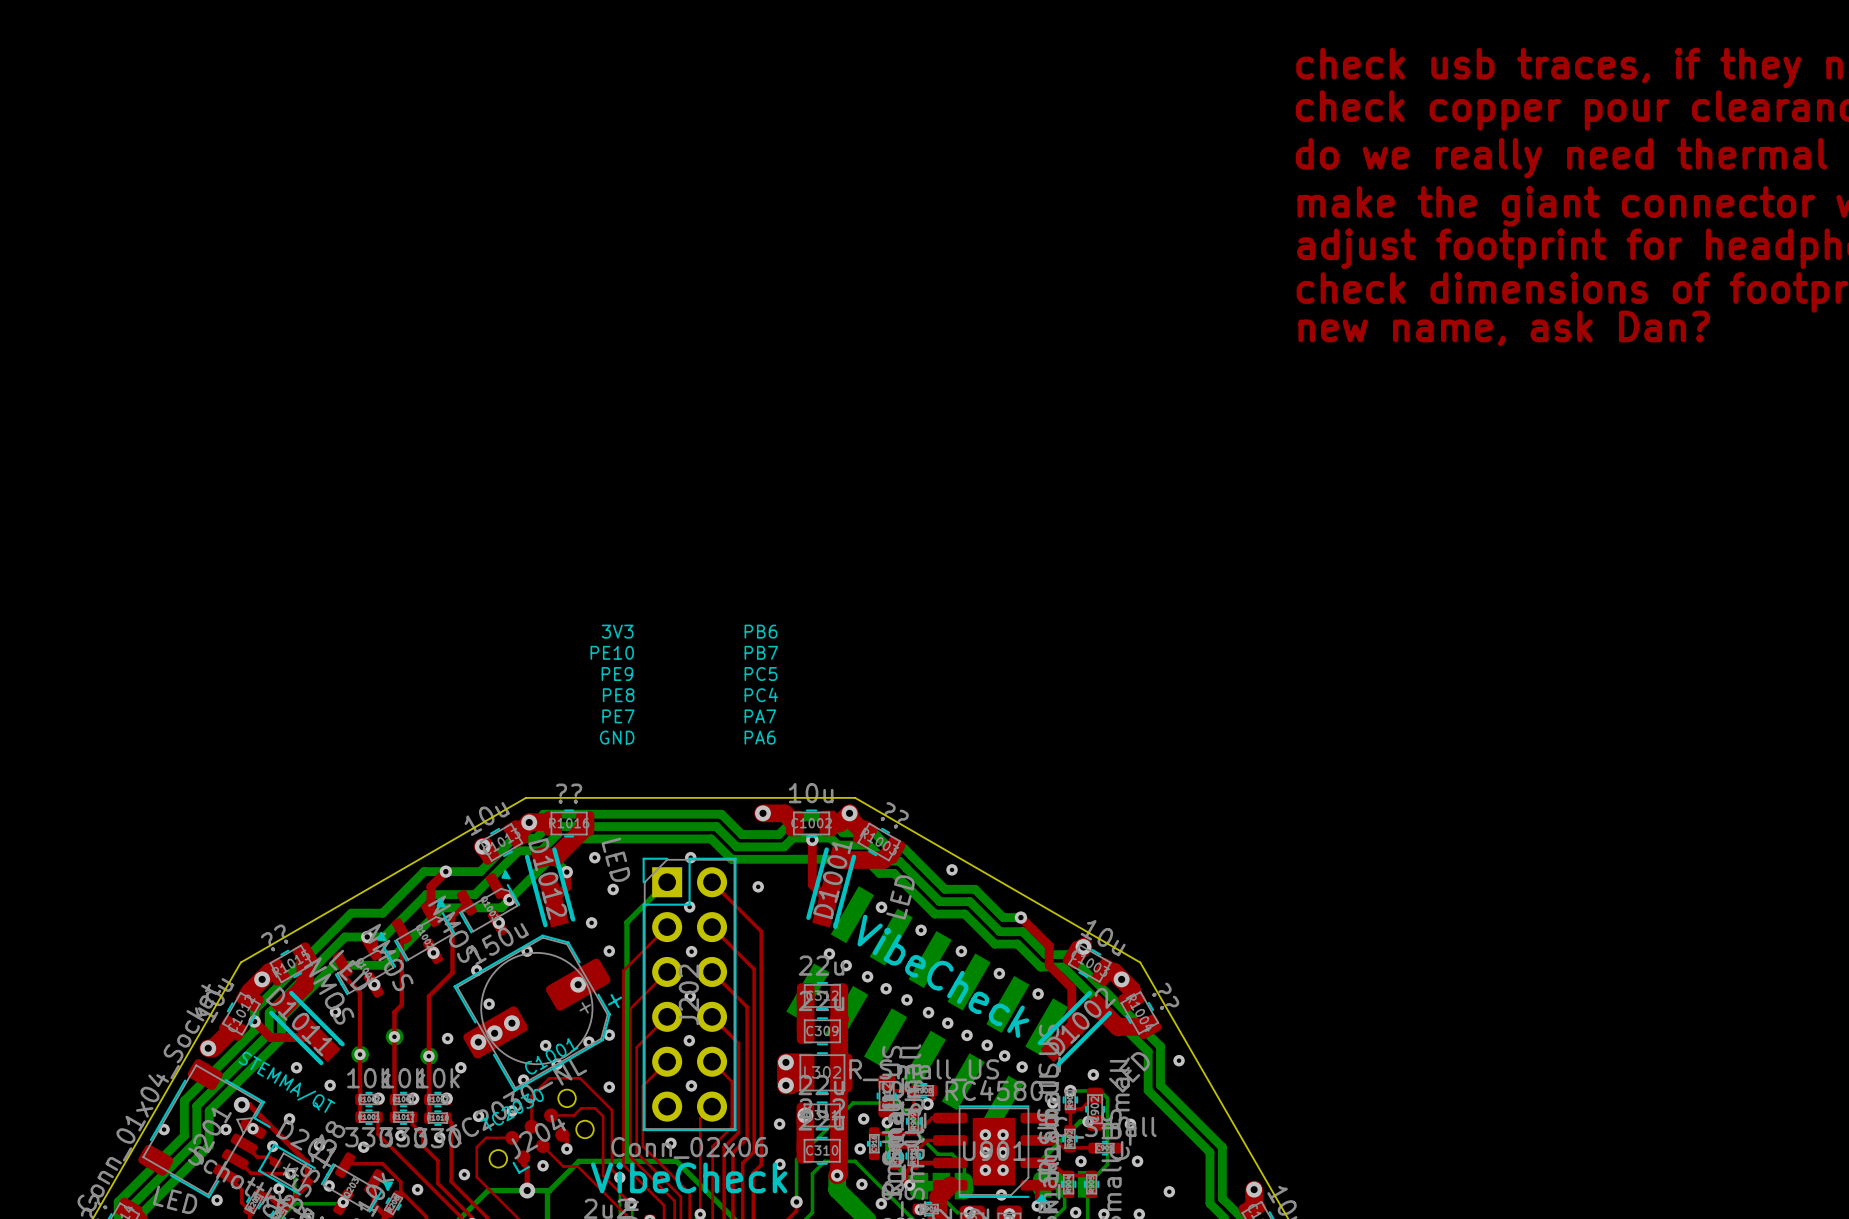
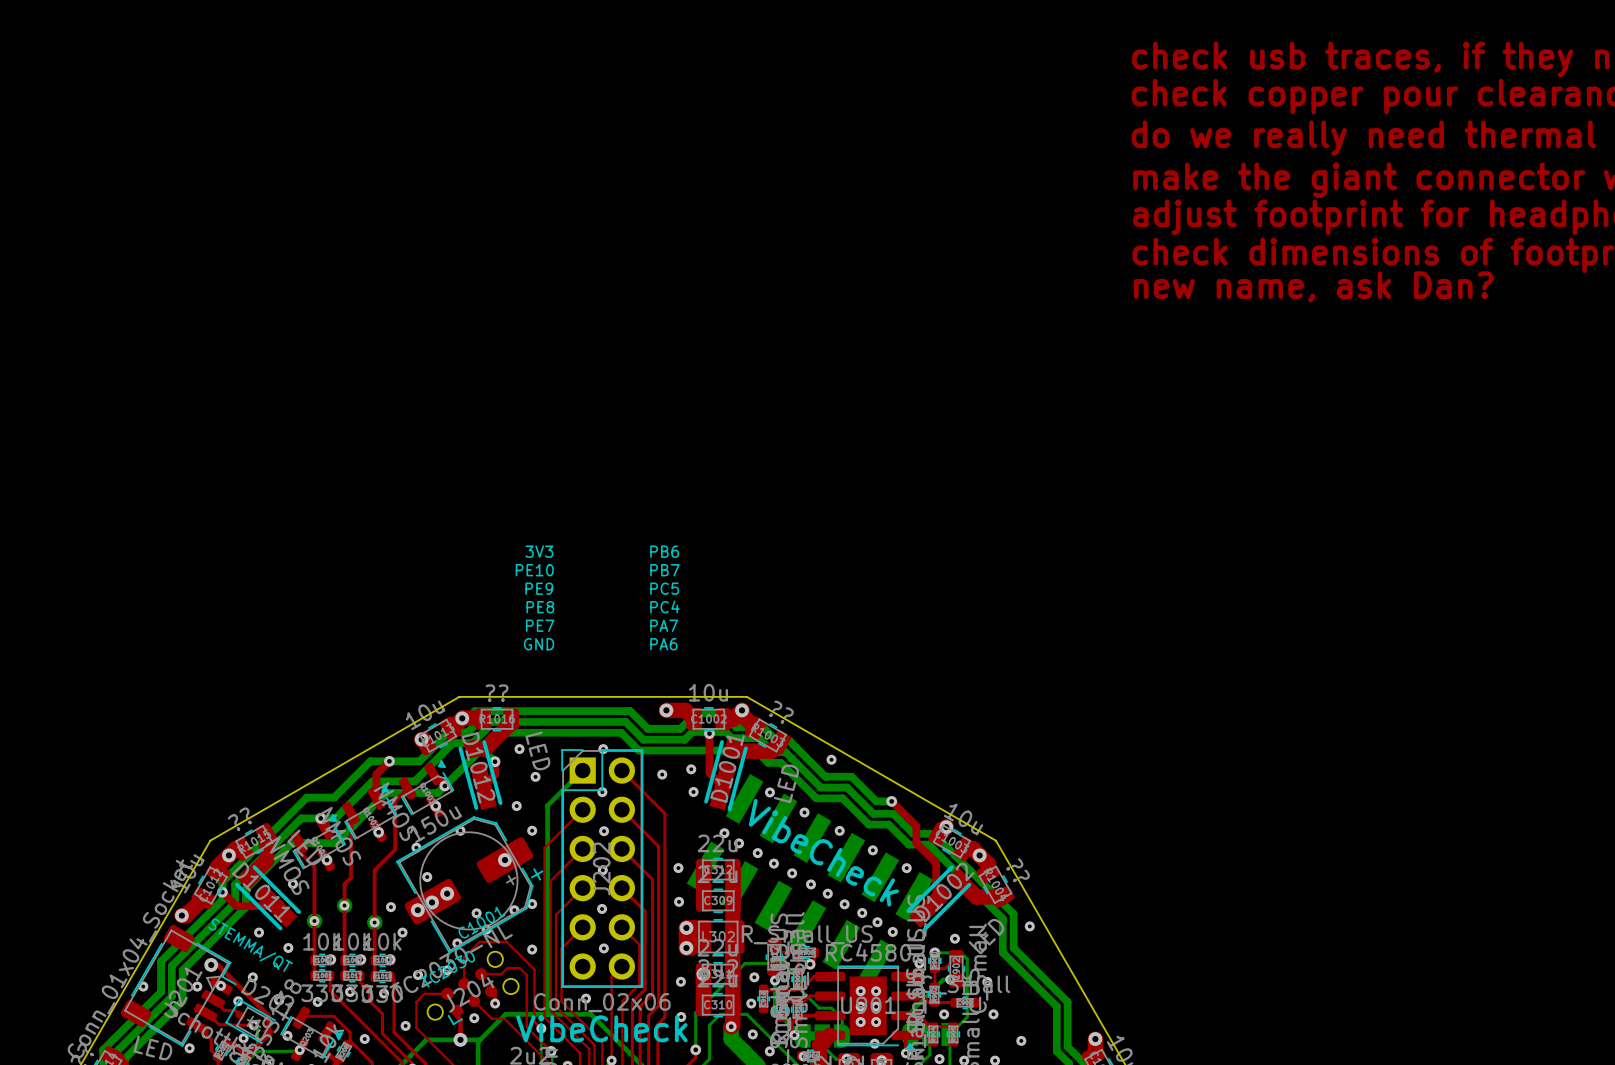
via: none -> (691, 769)
via: none -> (693, 792)
via: none -> (678, 868)
via: none -> (679, 901)

